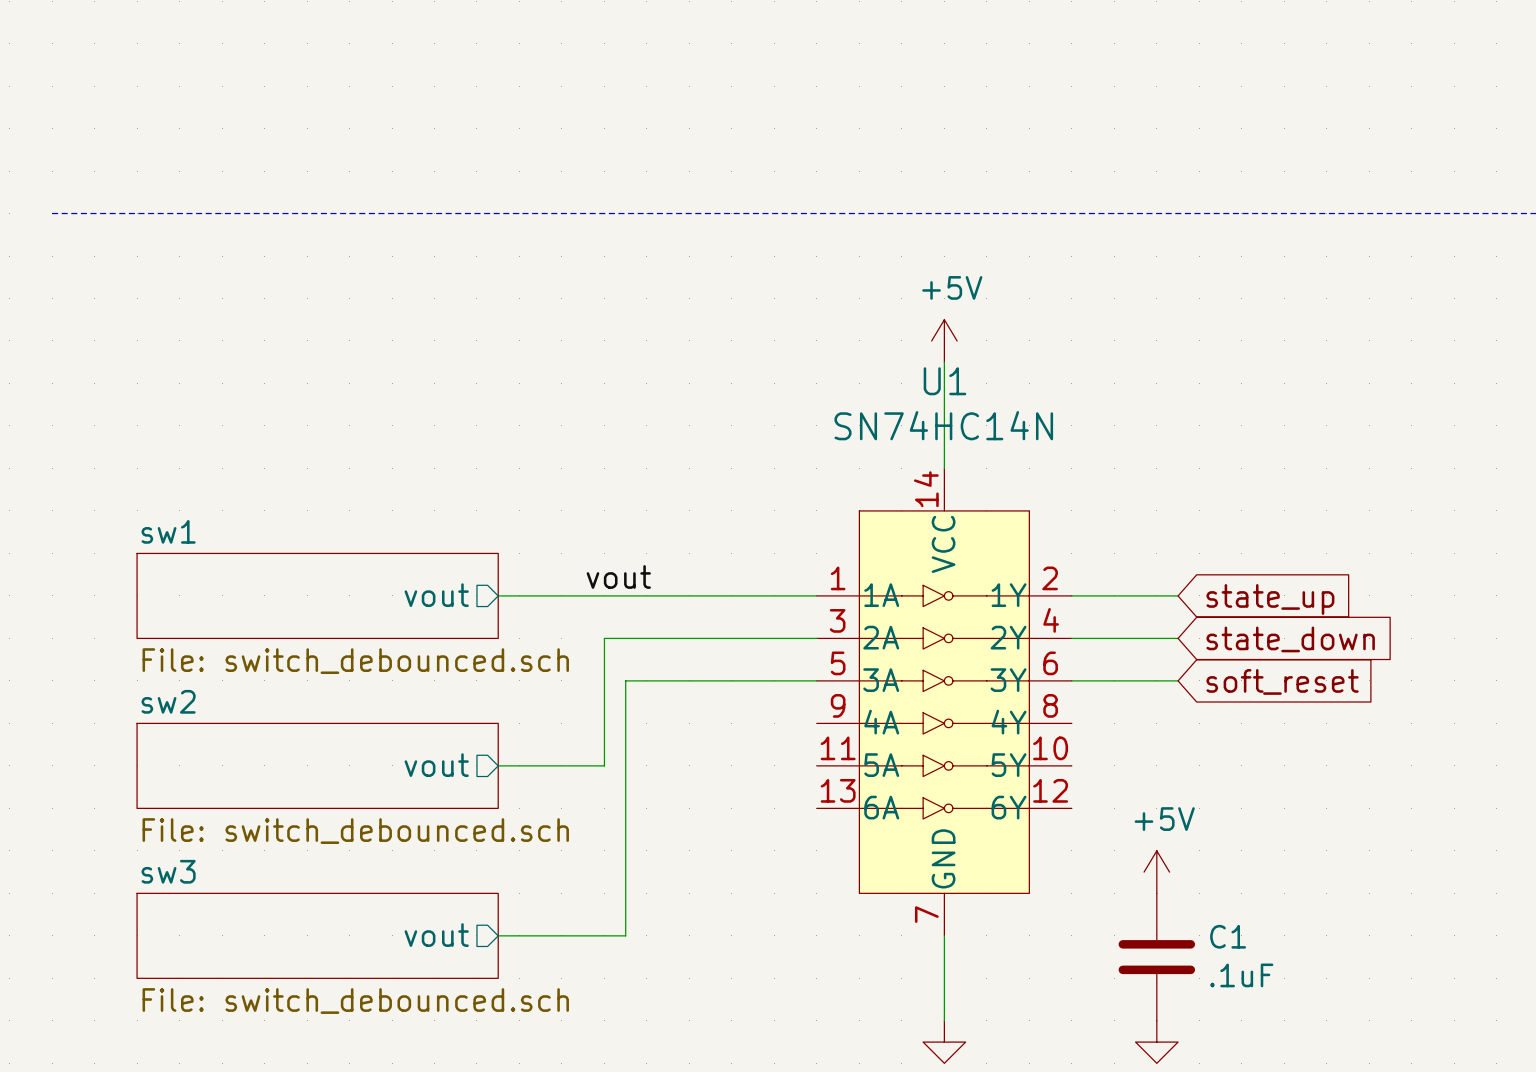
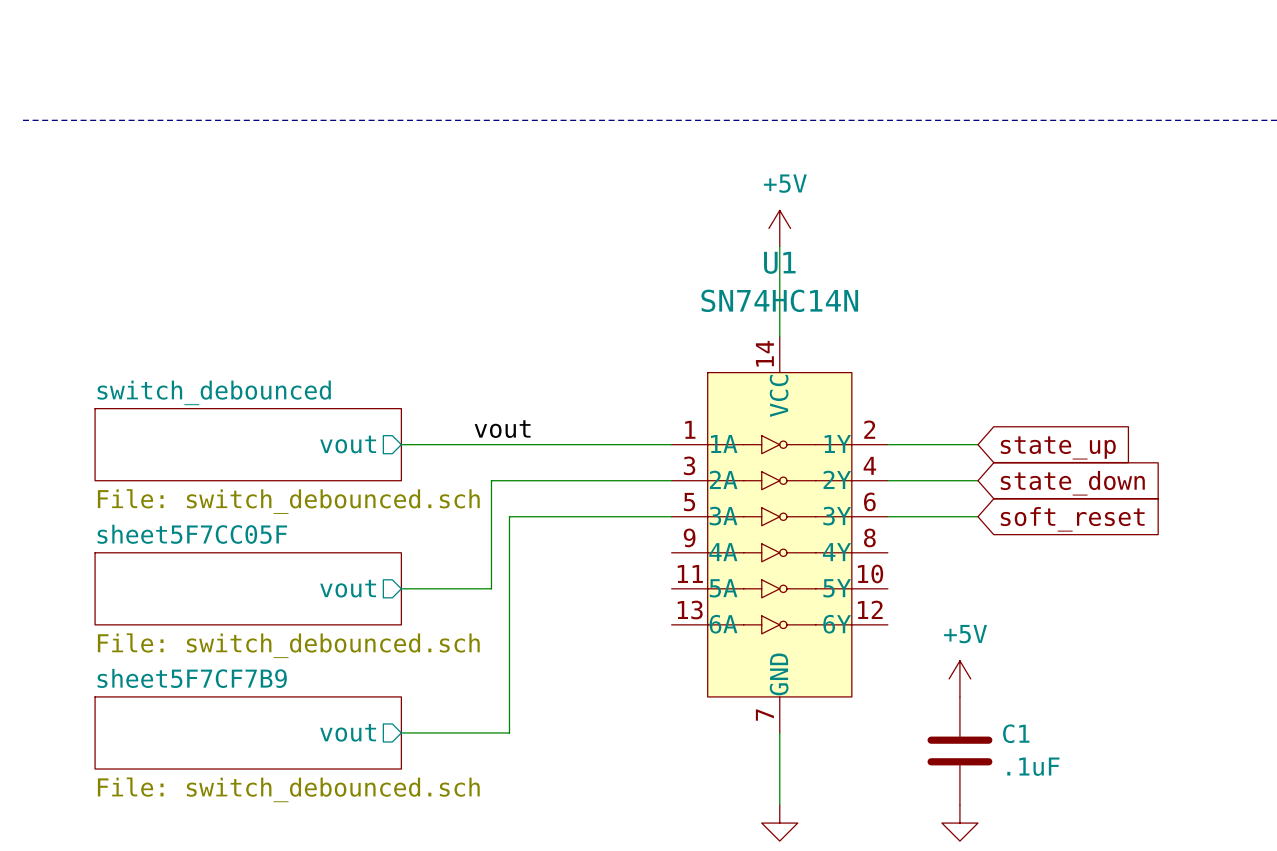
sheet sw1 name: sw1 (168, 531) -> switch_debounced (214, 392)
sheet sw2 name: sw2 (168, 701) -> sheet5F7CC05F (192, 534)
sheet sw3 name: sw3 (168, 871) -> sheet5F7CF7B9 (192, 678)

